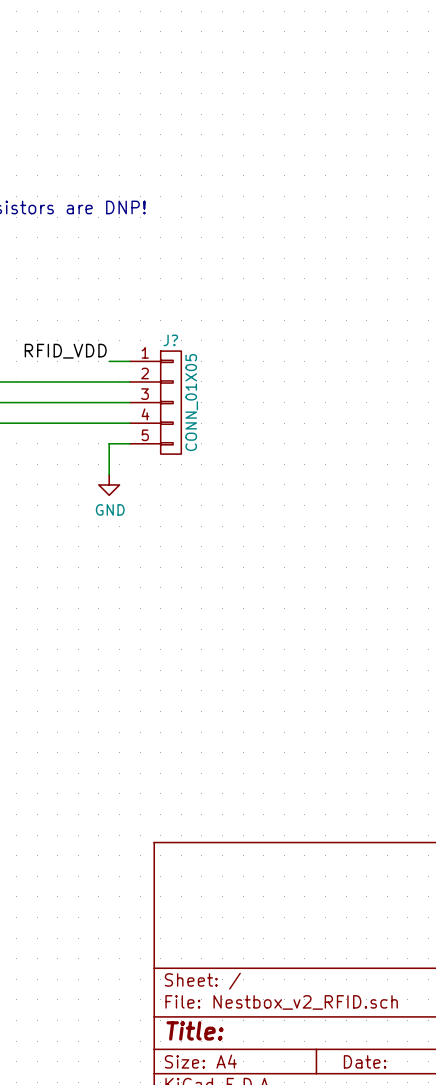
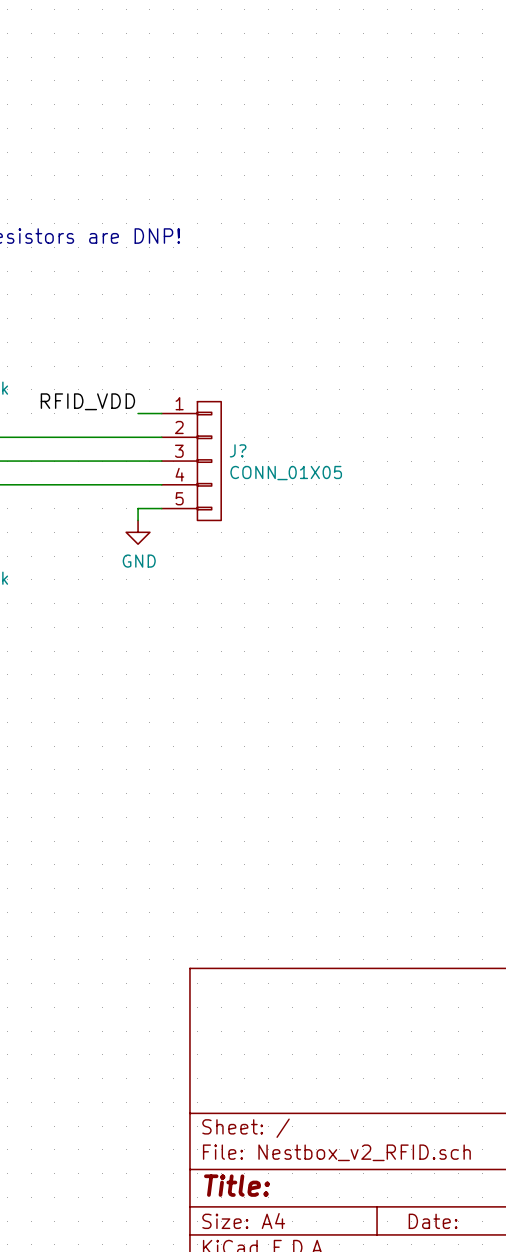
J? name position: J? (170, 340) -> J? (238, 450)
J? value rotation: 0° (191, 402) -> 90° clockwise (286, 473)
power symbol position: GND (109, 484) -> GND (138, 532)

